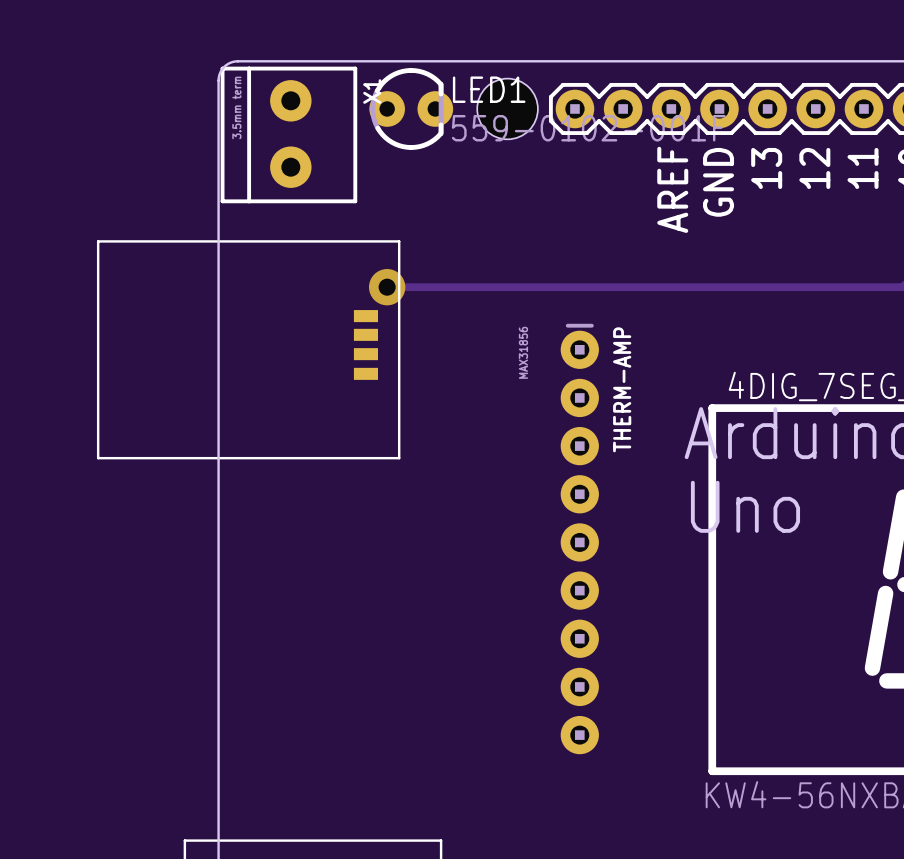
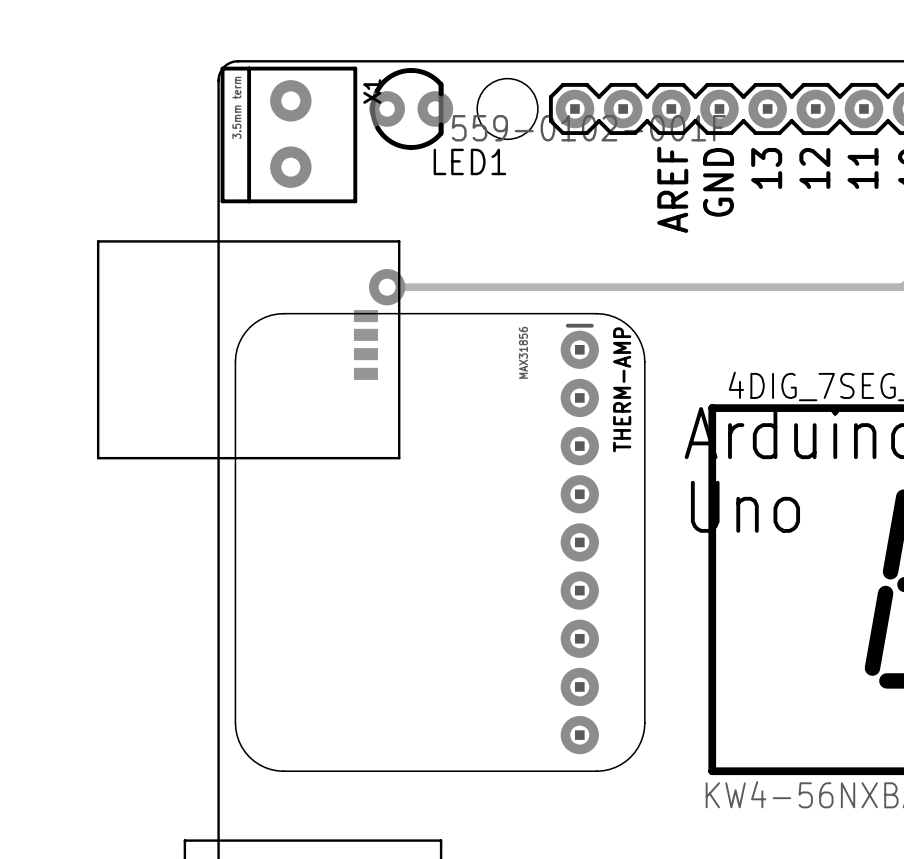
LED1 name position: LED1 (489, 89) -> LED1 (469, 161)
board edge: none -> (283, 313) (596, 313) (615, 317) (625, 323) (634, 332) (643, 349) (644, 361) (644, 723) (641, 741) (634, 752) (625, 761) (609, 769) (596, 771) (283, 771) (265, 767) (254, 761) (245, 752) (237, 735) (235, 723) (235, 355) (239, 343) (249, 327) (265, 317) (283, 313)

